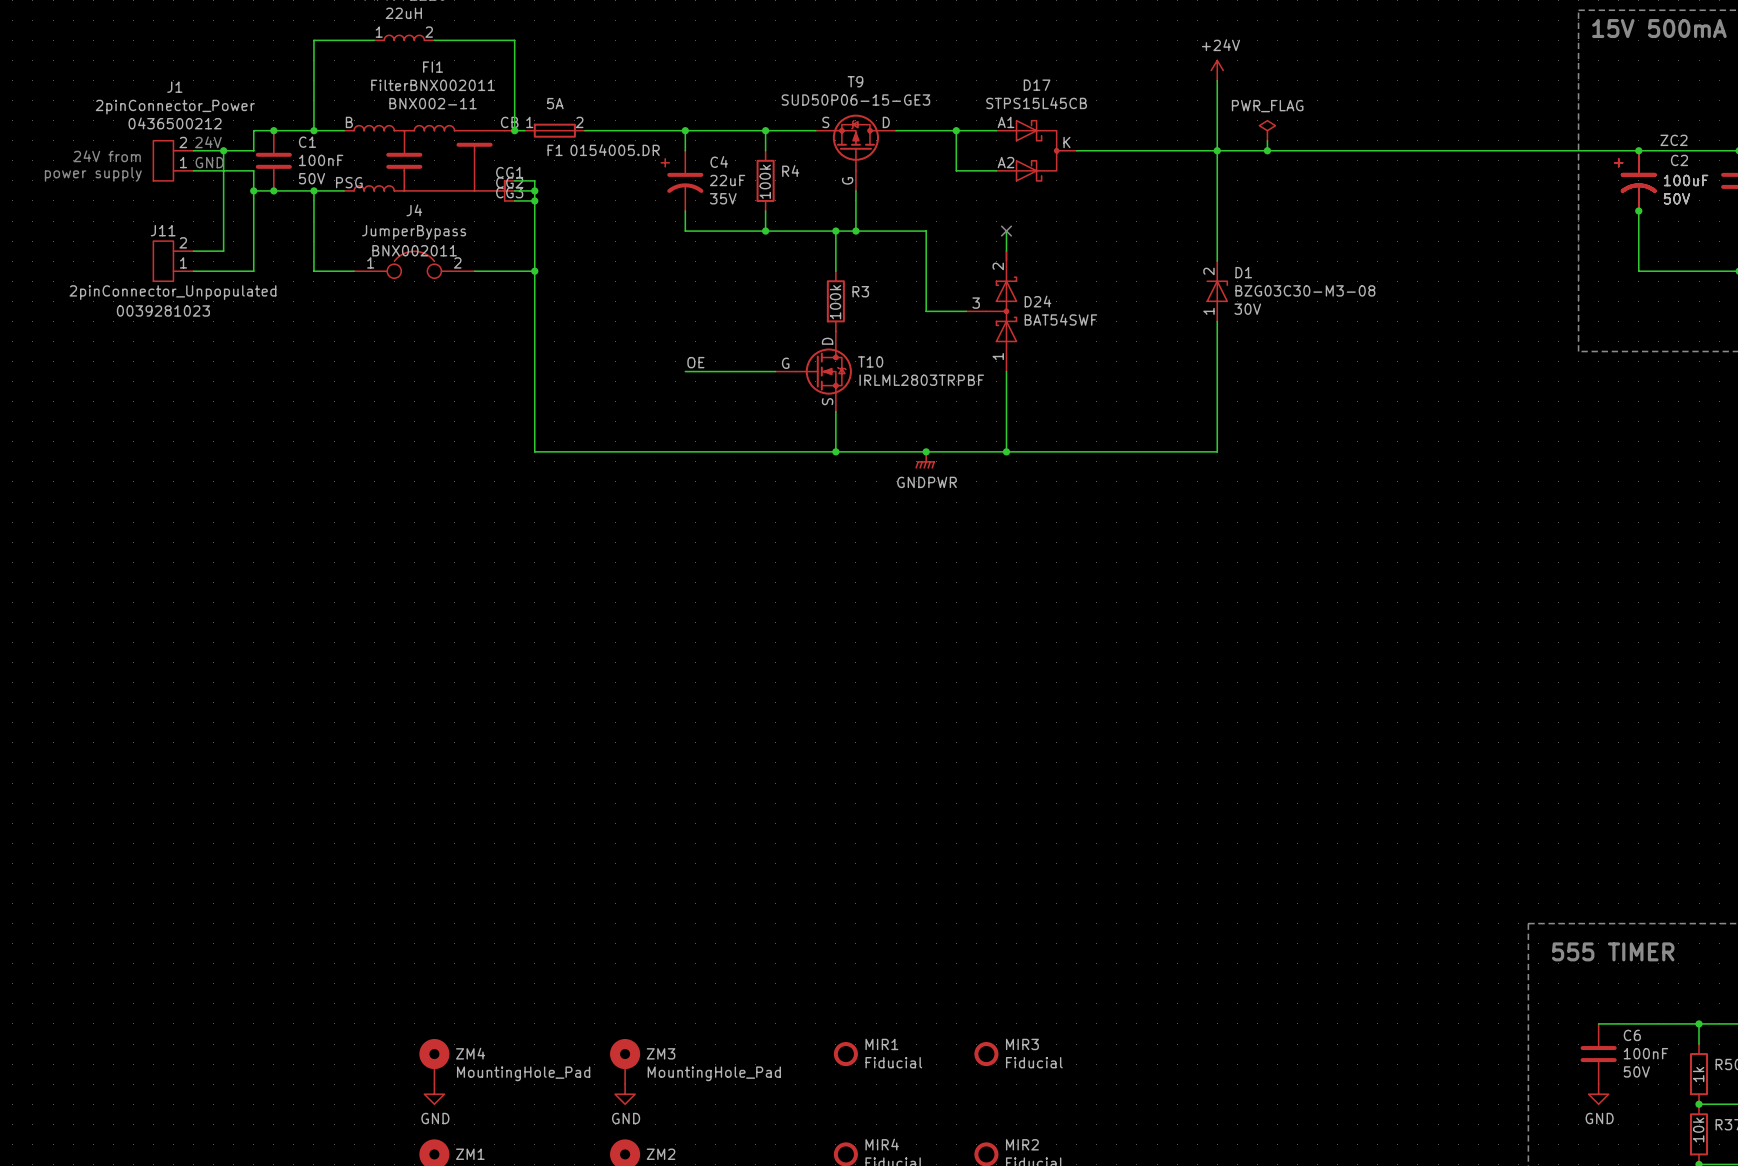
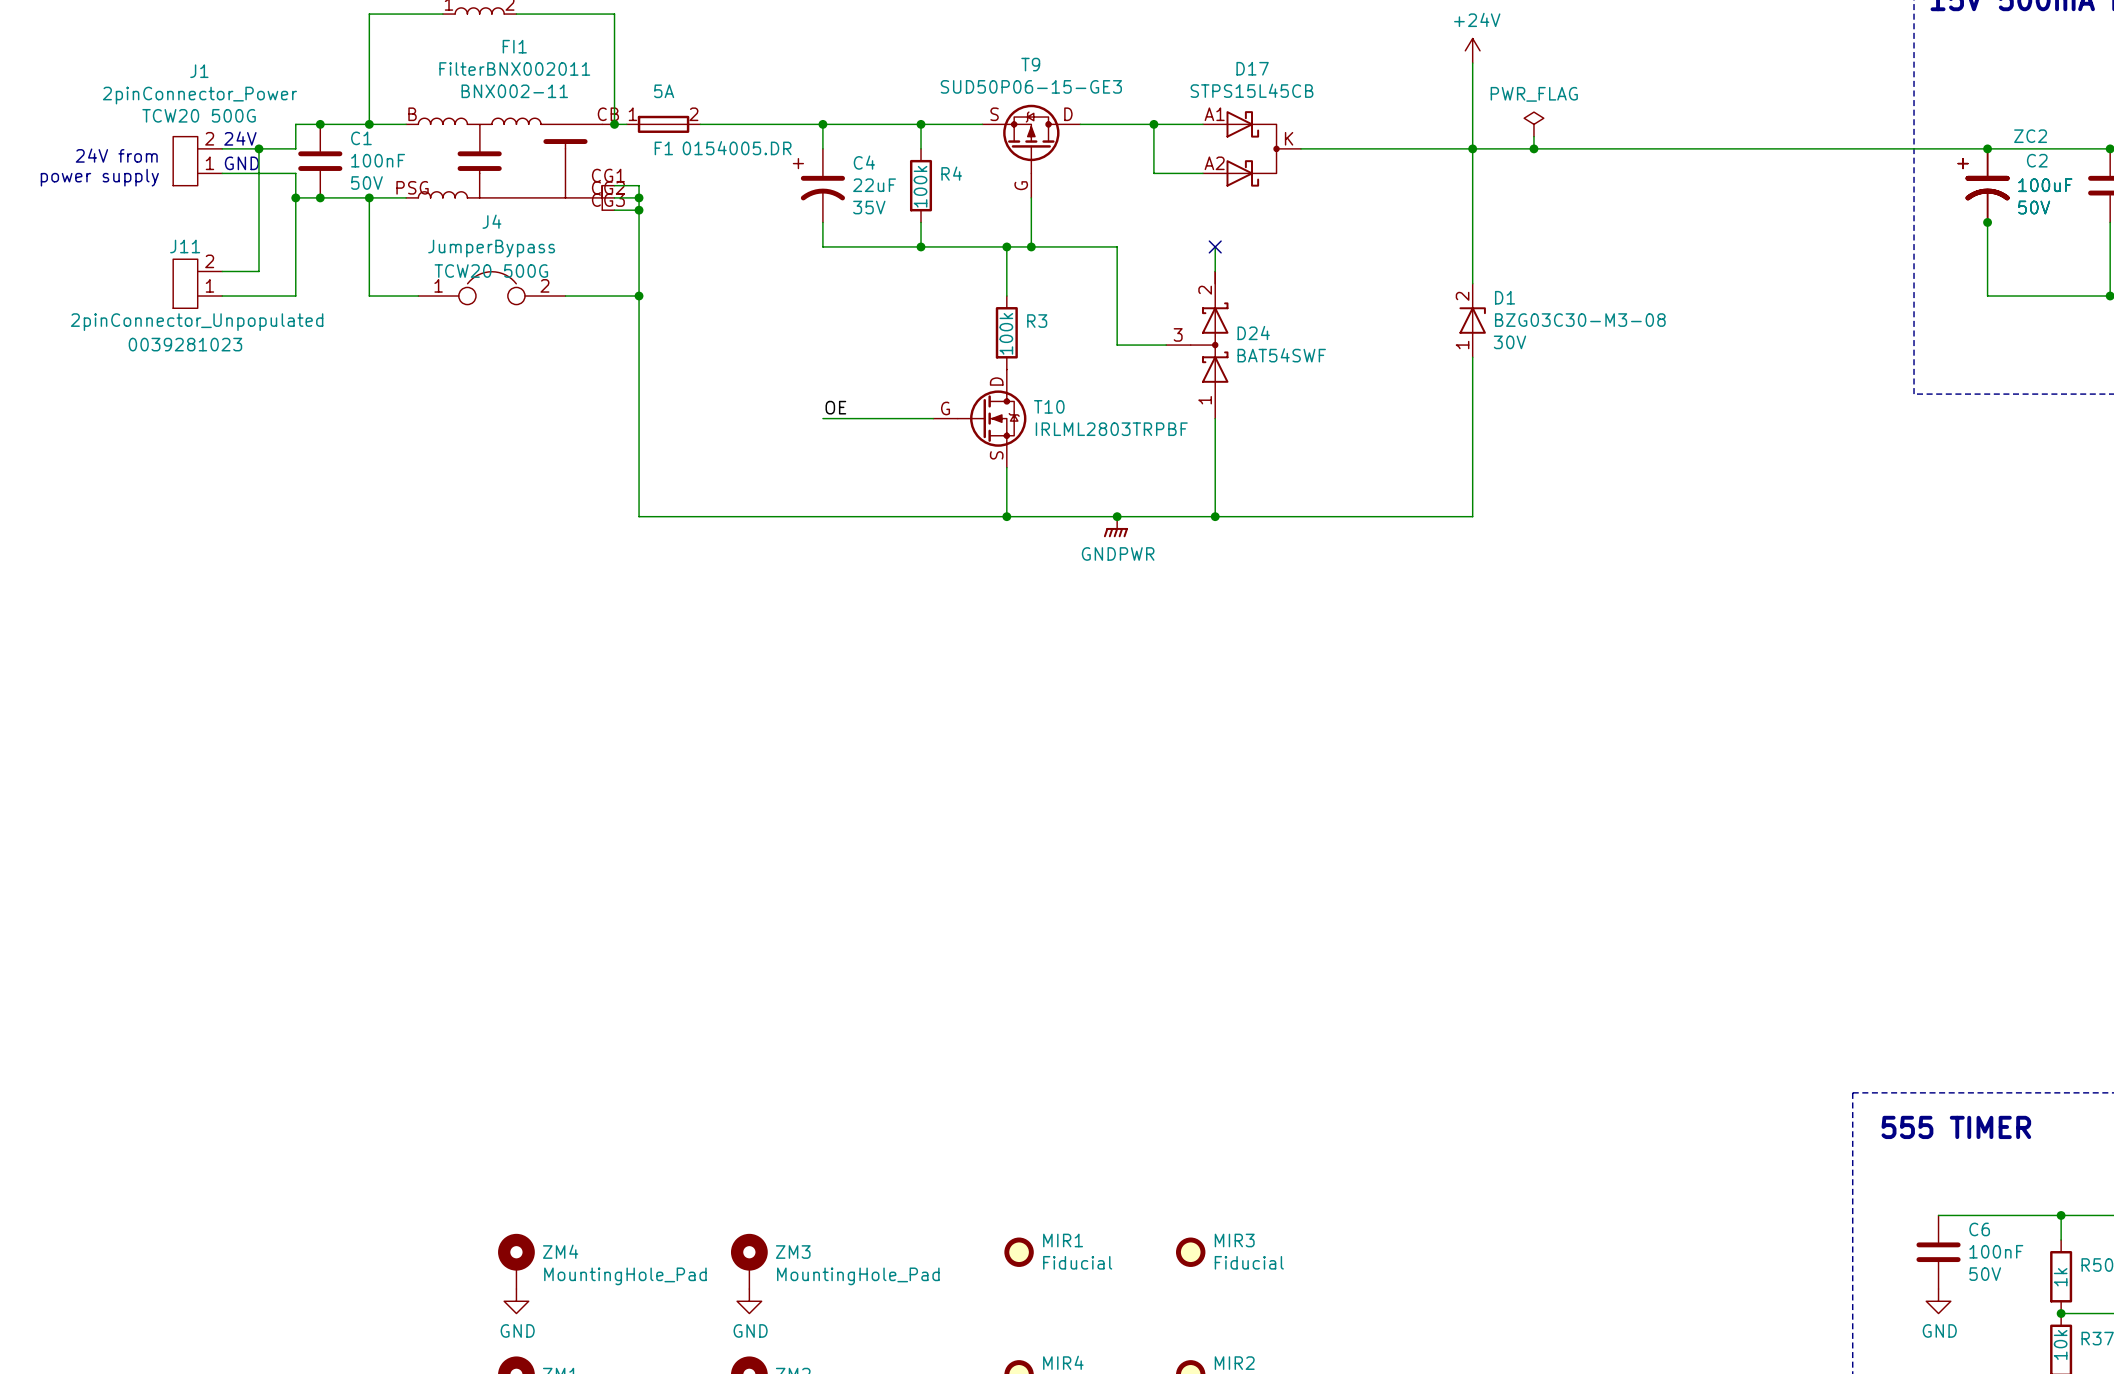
J1 text: 0436500212 (175, 123) -> TCW20 500G (199, 115)
J4 text: BNX002011 (414, 250) -> TCW20 500G (491, 271)

